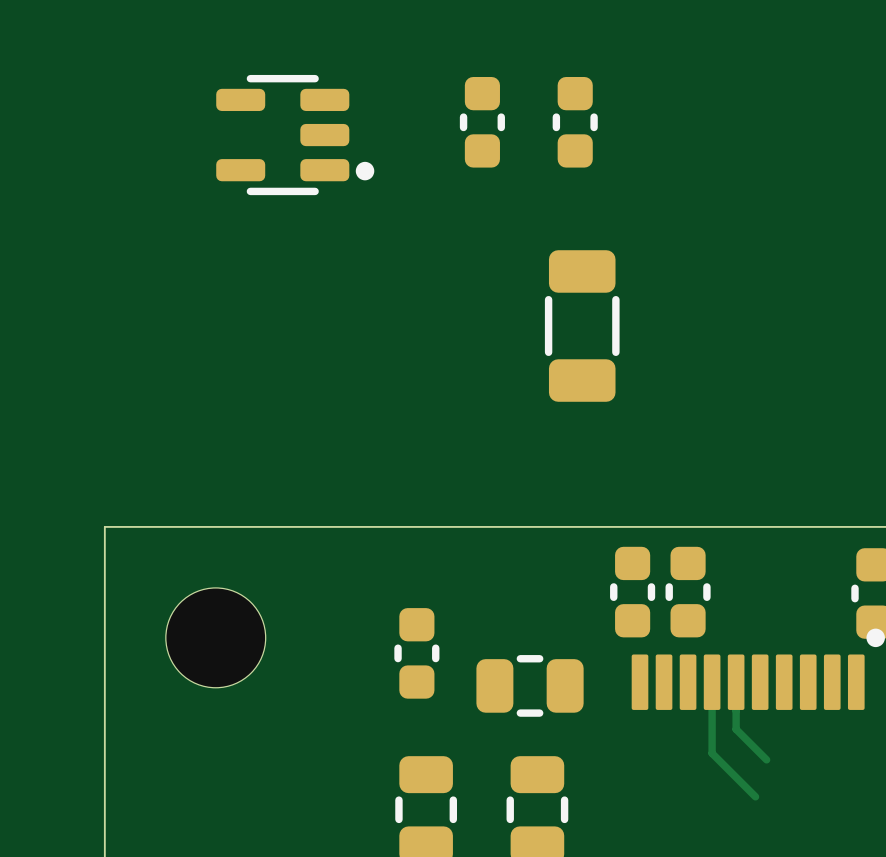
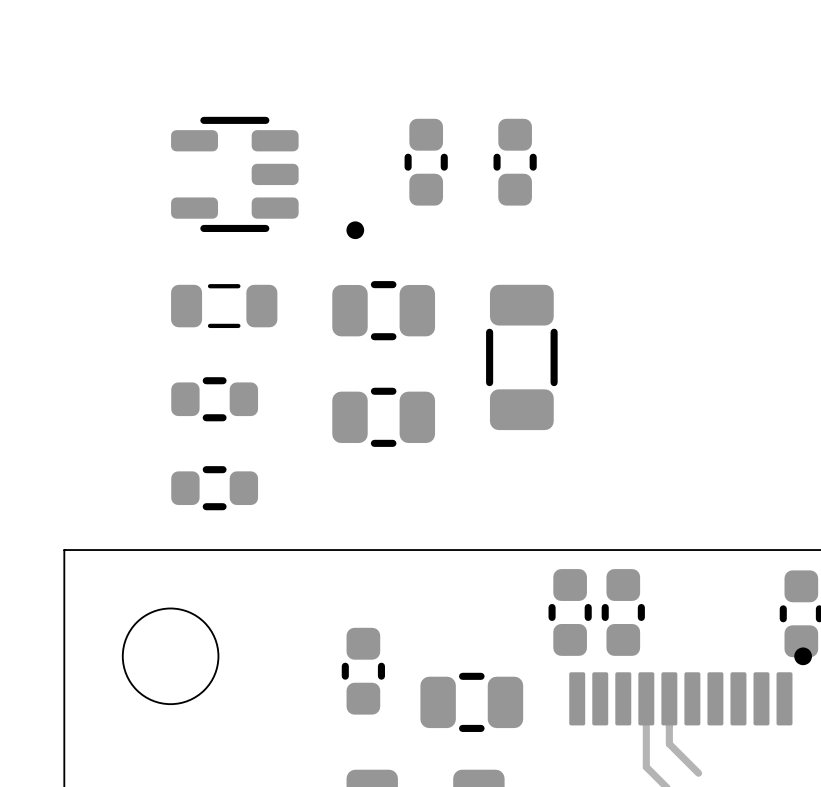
part footprint: [216, 74, 375, 196] -> [171, 116, 365, 240]
part: none -> (224, 306)
part: none -> (383, 310)
part: none -> (214, 399)
part: none -> (383, 417)
part: none -> (214, 488)

